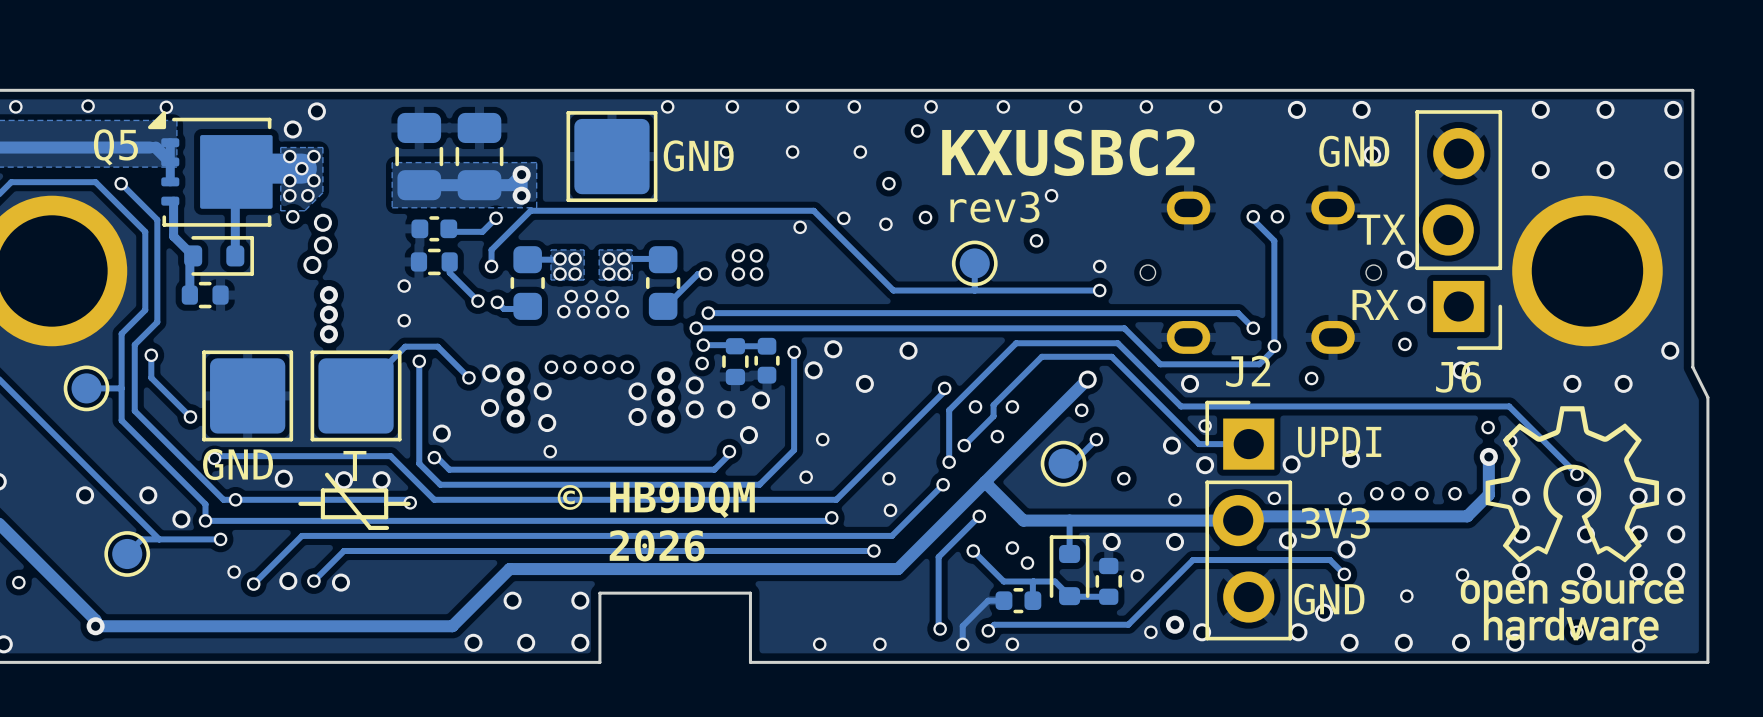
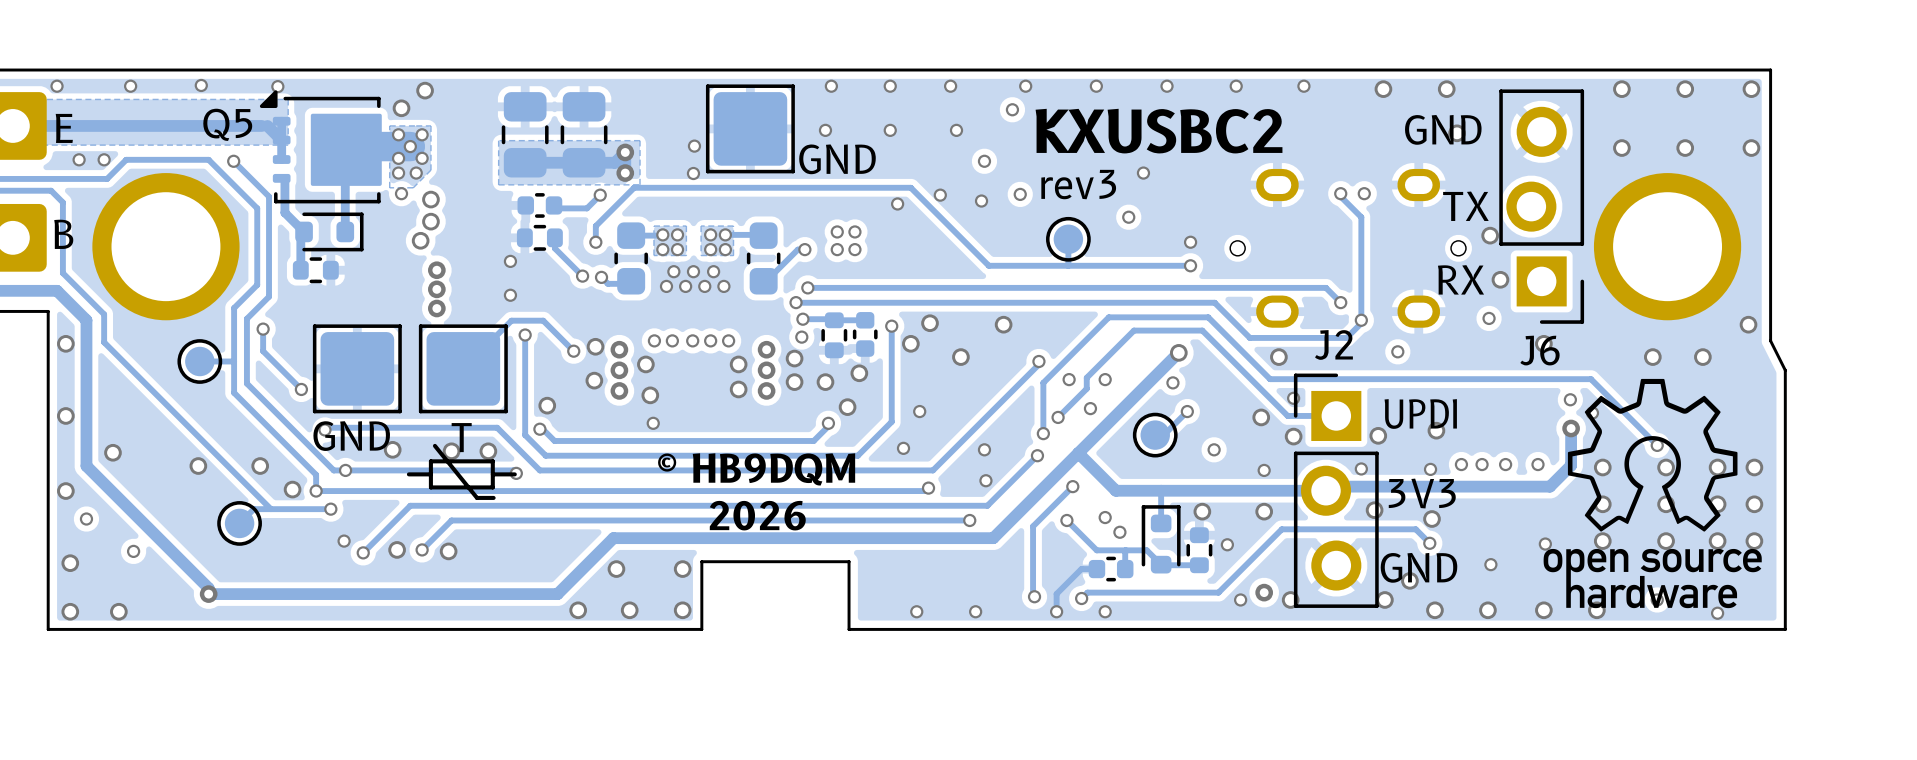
via: (667, 106) -> none
text position: GND (698, 155) -> GND (837, 159)
part position: (611, 156) -> (750, 128)
via: none -> (694, 146)
via: none -> (693, 173)

